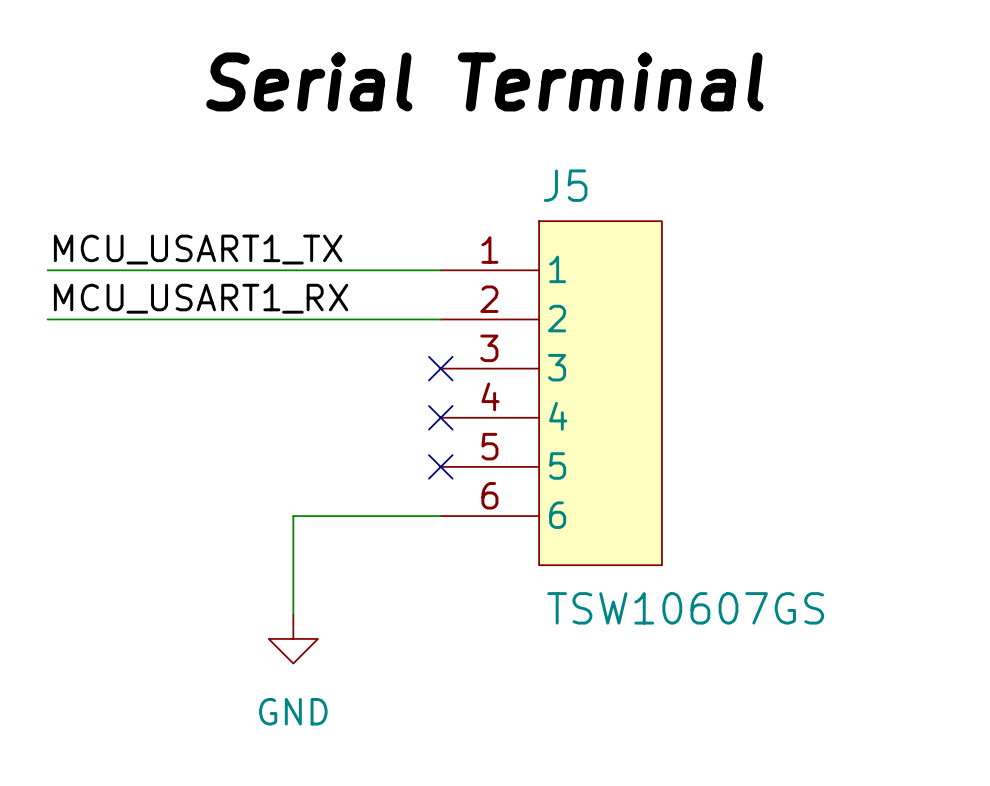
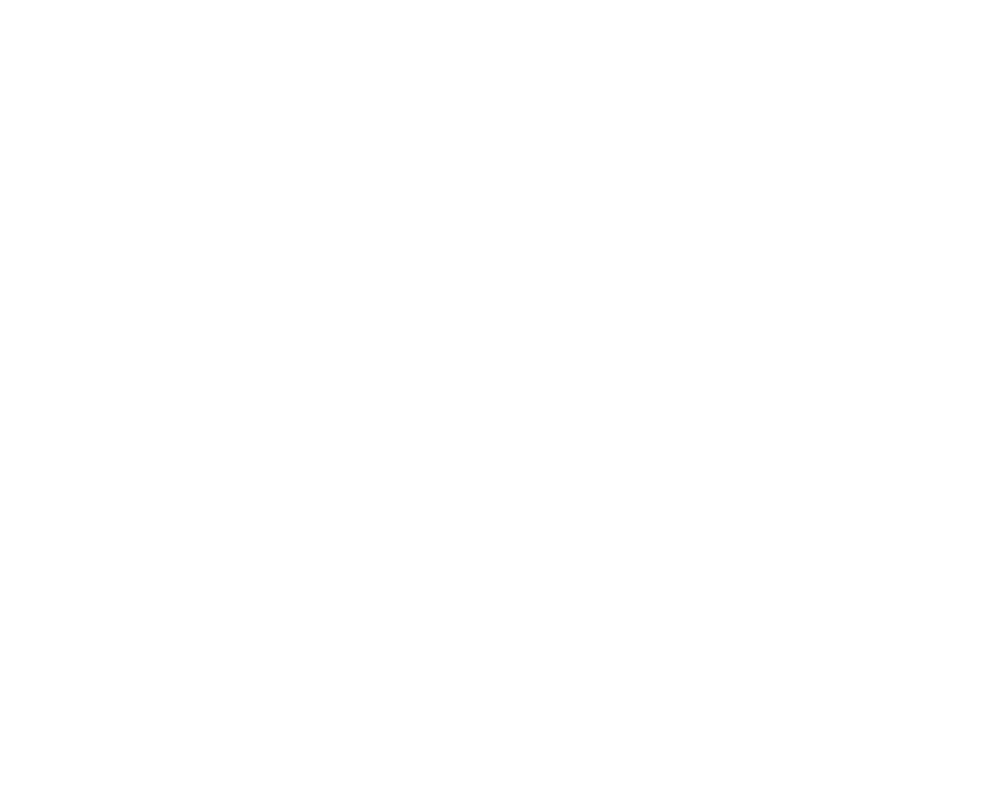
label: Serial Terminal (484, 81) -> none
label: MCU_USART1_TX (198, 249) -> none
wire: (47, 270) (440, 270) -> none
label: MCU_USART1_RX (201, 298) -> none
wire: (47, 319) (440, 319) -> none
no-connect mark: (440, 368) -> none
J5: TSW10607GS (551, 393) -> none
no-connect mark: (440, 417) -> none
no-connect mark: (440, 466) -> none
wire: (440, 516) (293, 516) (293, 614) -> none
power symbol: GND (293, 638) -> none

